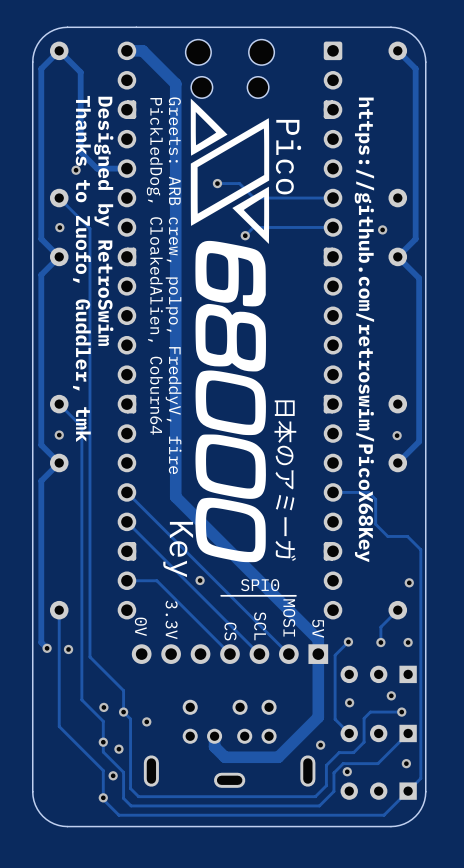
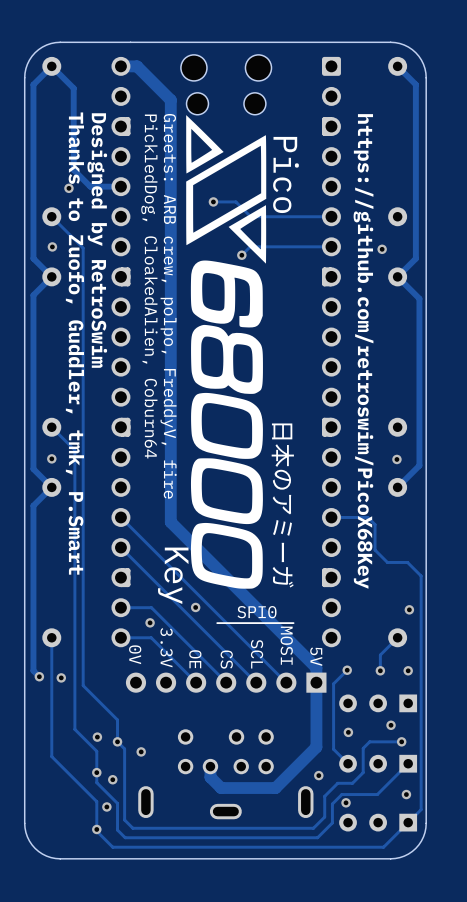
text: Thanks to Zuofo, Guddler, tmk (81, 268) -> Thanks to Zuofo, Guddler, tmk, P.Smart (74, 343)
via: none -> (150, 622)
track: none -> (120, 637) (151, 637) (196, 682)
text: none -> OE (195, 659)

